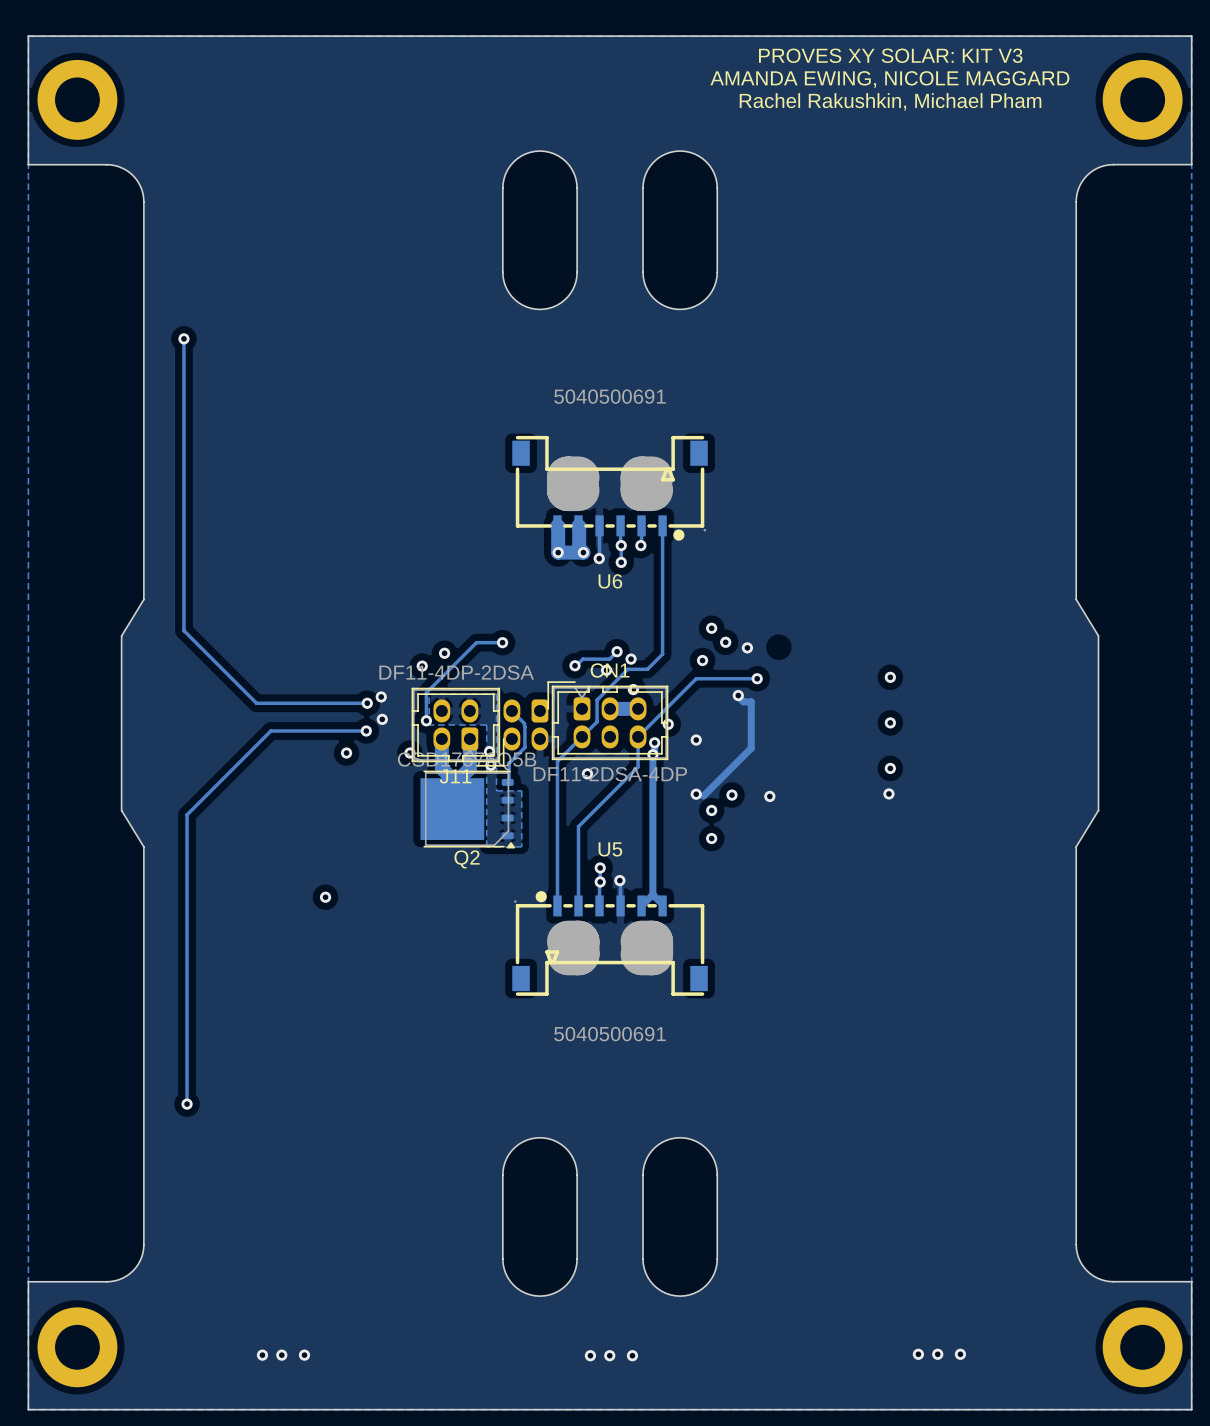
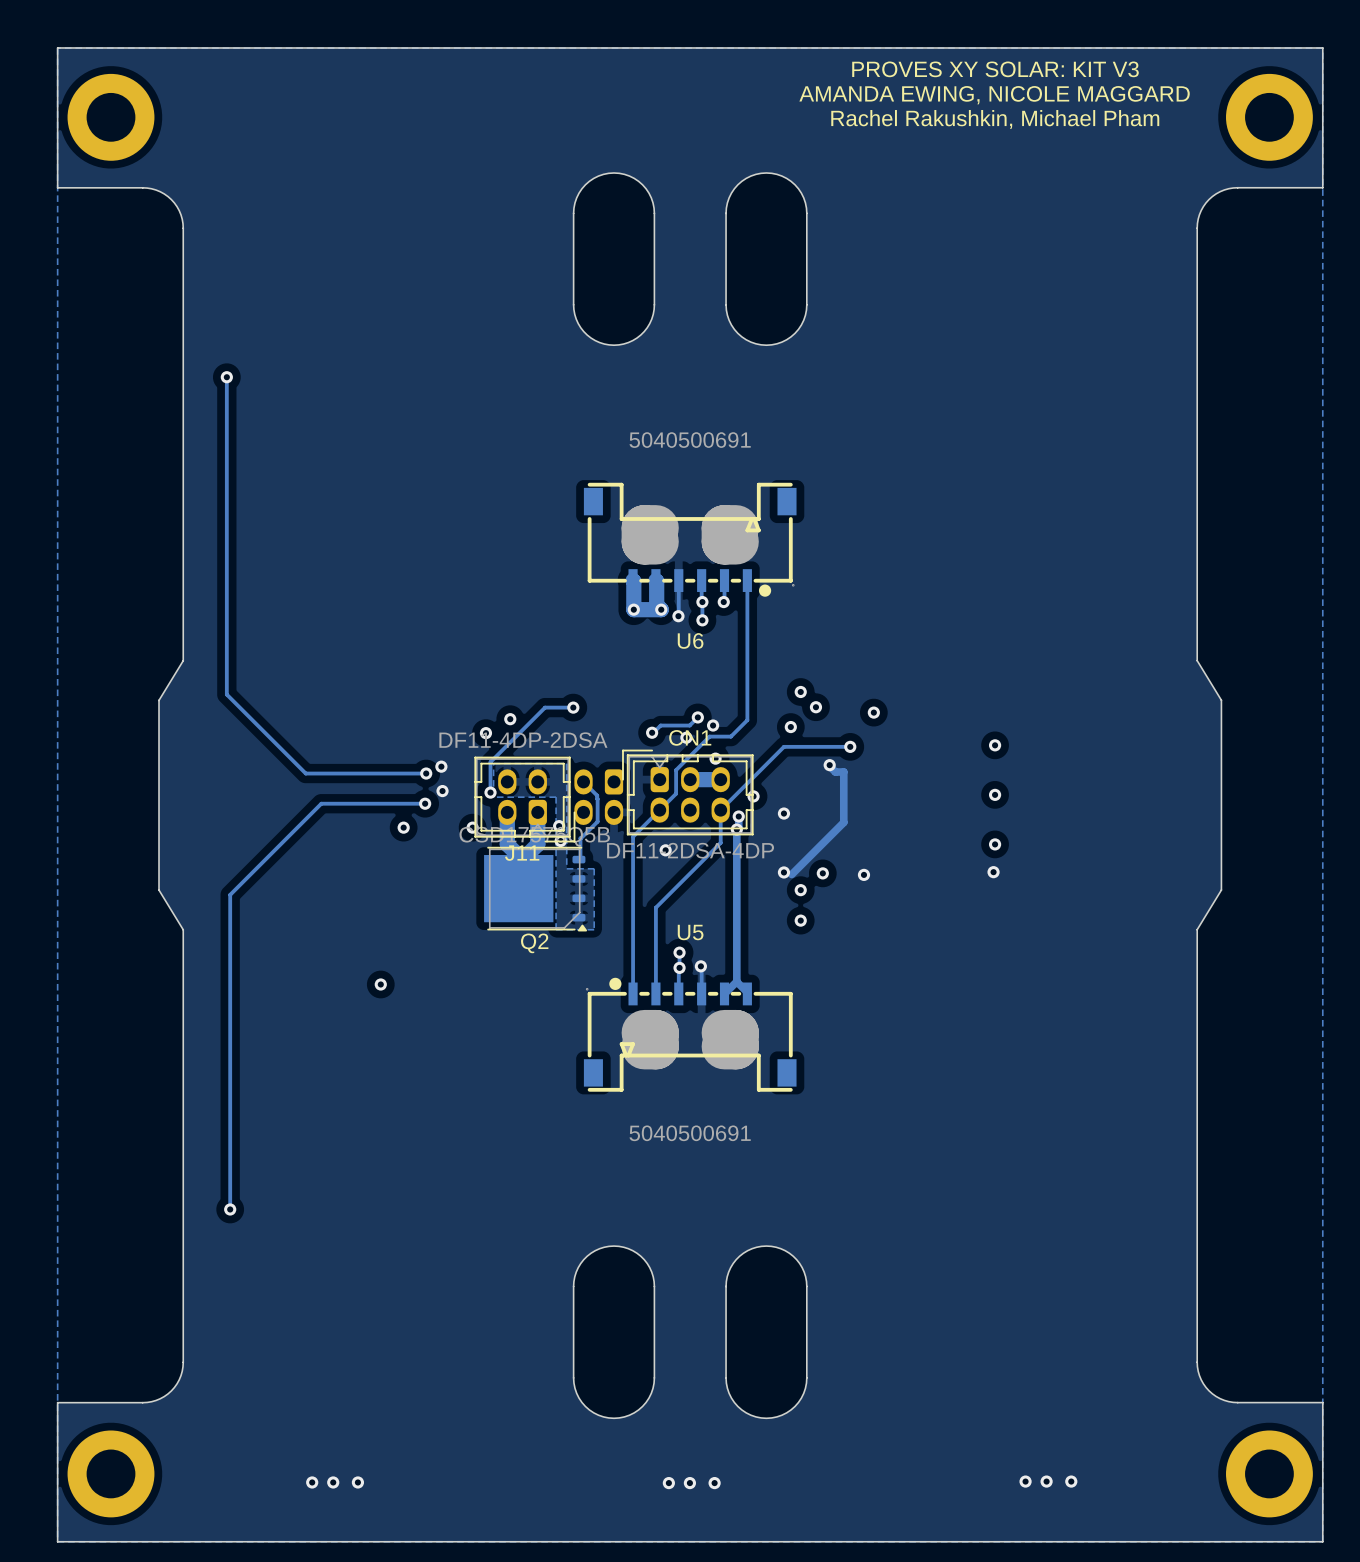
via position: (747, 647) -> (873, 712)

